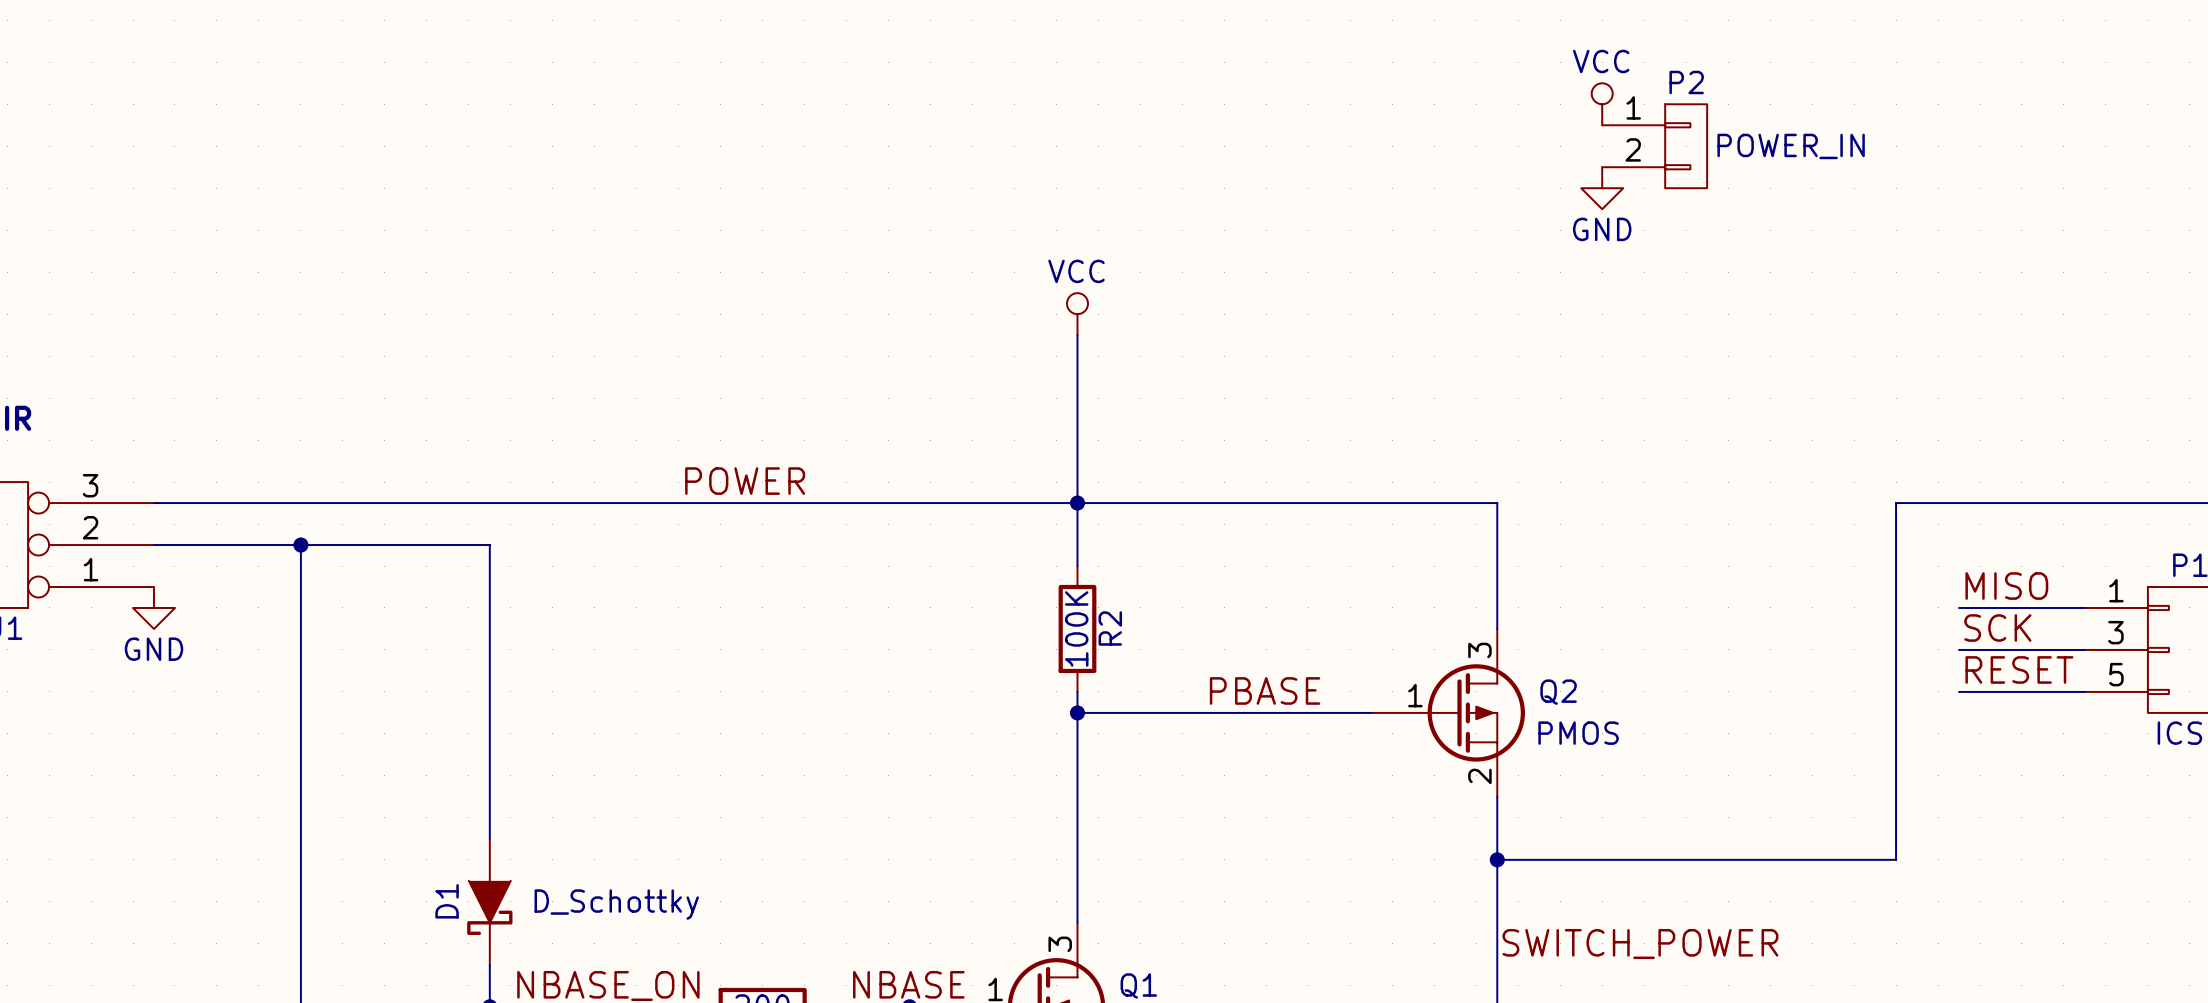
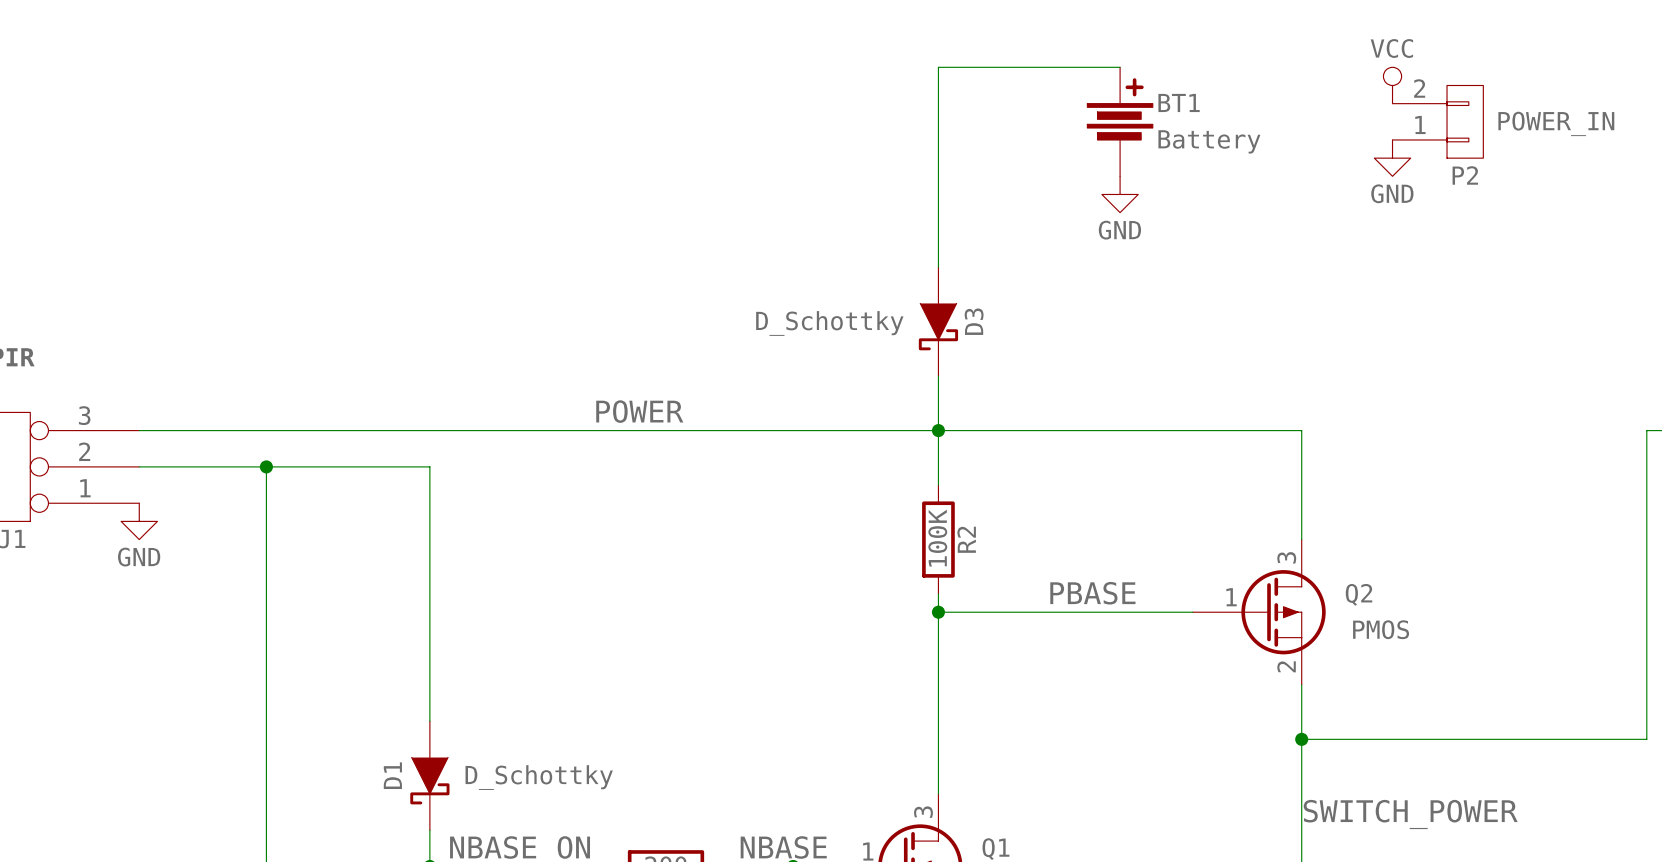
wire: none -> (1120, 67) (938, 67) (938, 267)
BT1: none -> Battery (1120, 121)
P2 flip: as is (1686, 146) -> up-down (1465, 121)
power symbol: none -> GND (1120, 194)
power symbol: VCC (1077, 314) -> none
D3: none -> D_Schottky (938, 321)

